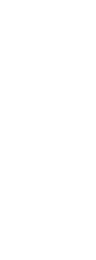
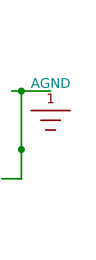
wire: none -> (11, 91) (50, 91)
wire: none -> (21, 91) (21, 178) (1, 178)
junction: none -> (21, 91)
power symbol: none -> (50, 120)
junction: none -> (21, 149)

